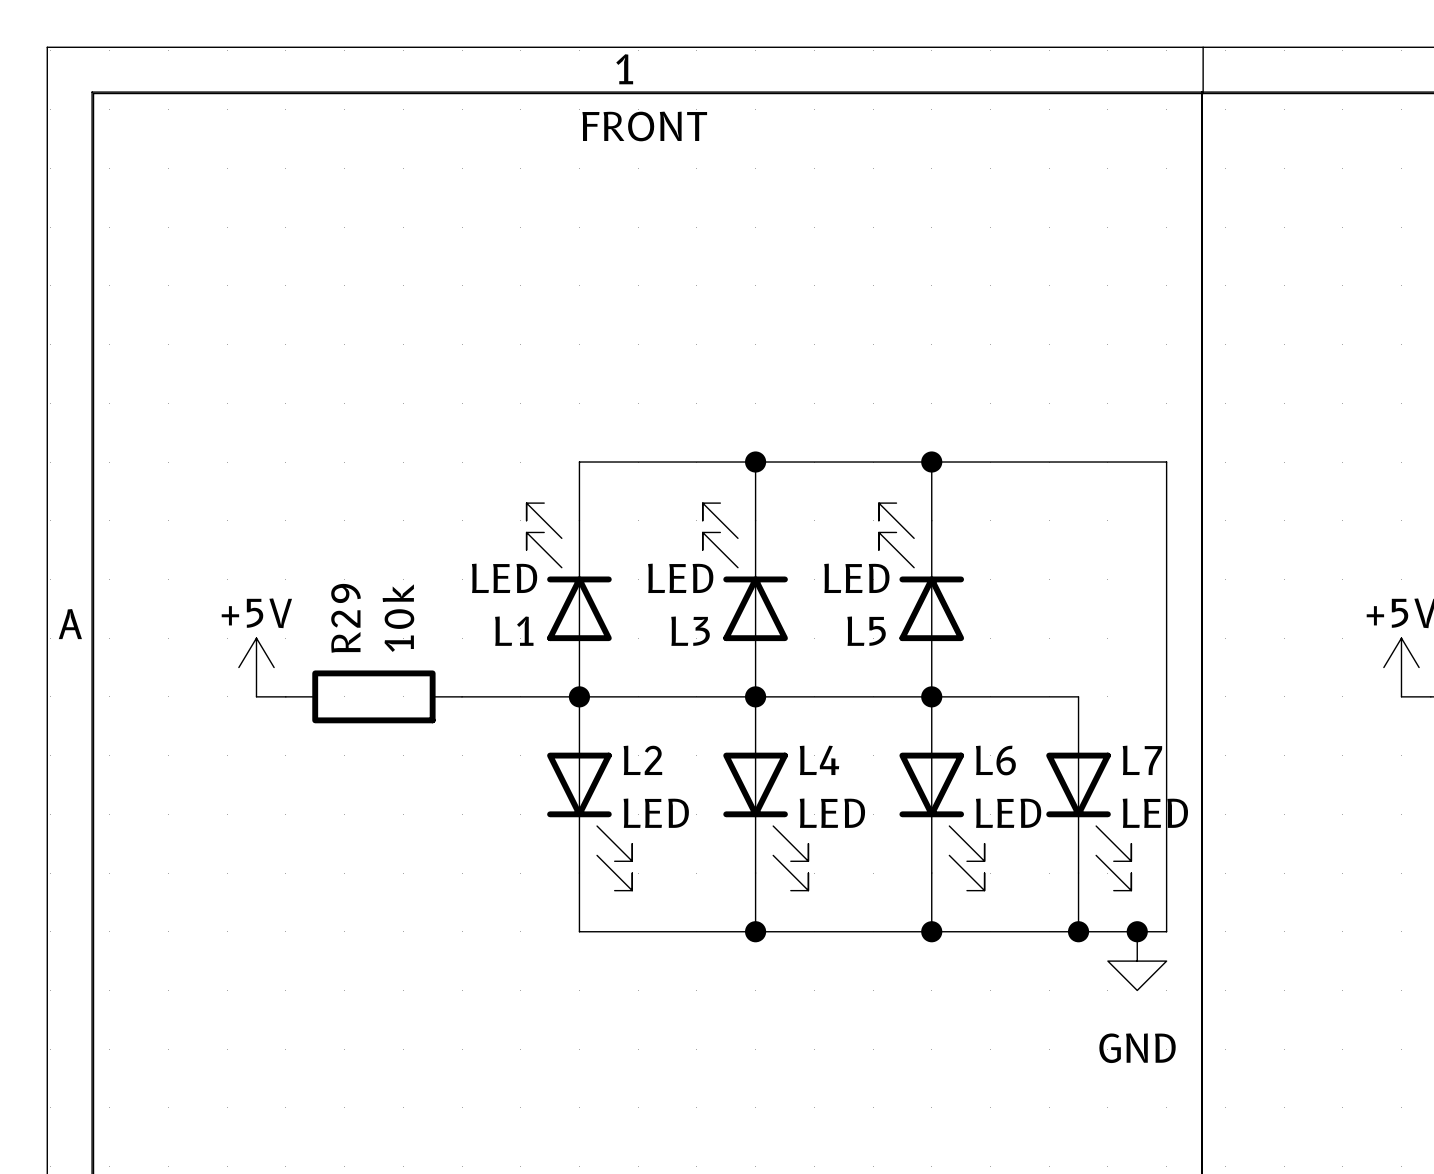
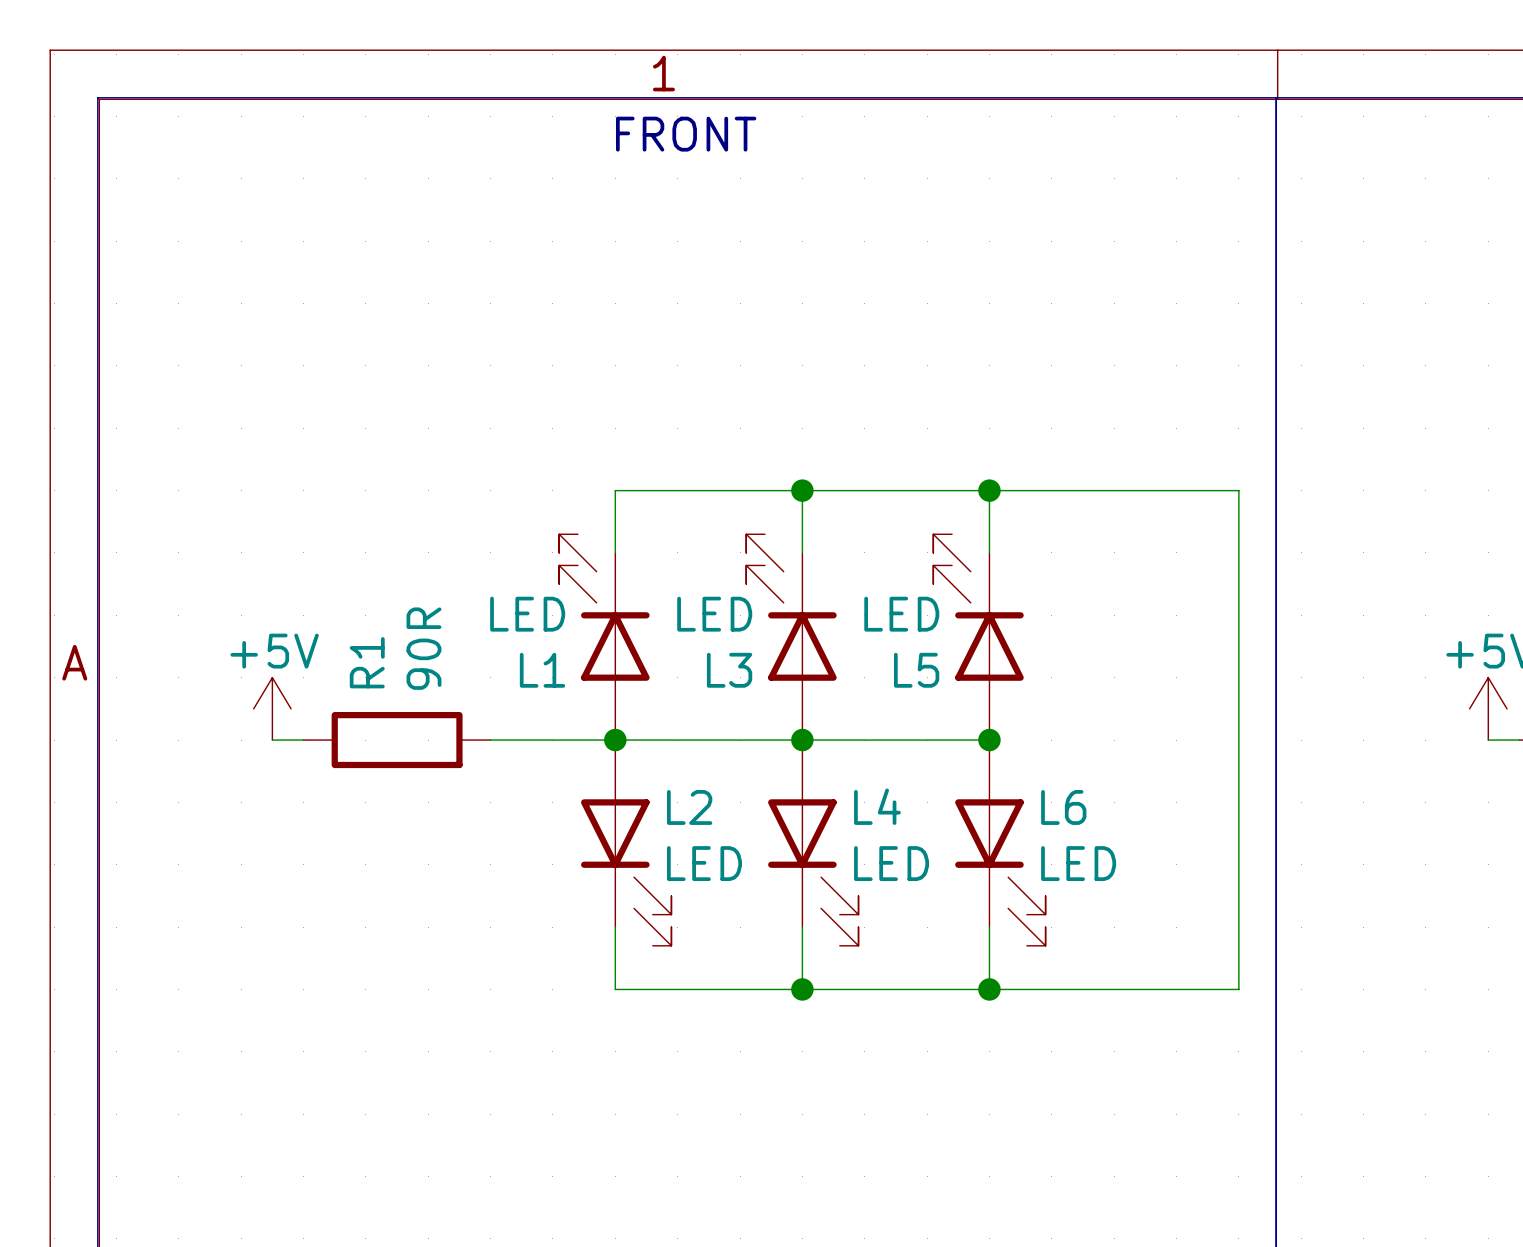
R29 name: R29 (346, 618) -> R1 (367, 662)
R29 value: 10k (398, 618) -> 90R (423, 648)
wire: (931, 696) (1078, 696) -> none
L7: LED (1088, 793) -> none
wire: (1078, 873) (1078, 931) -> none
junction: (1078, 931) -> none
junction: (1137, 931) -> none
power symbol: GND (1137, 961) -> none

